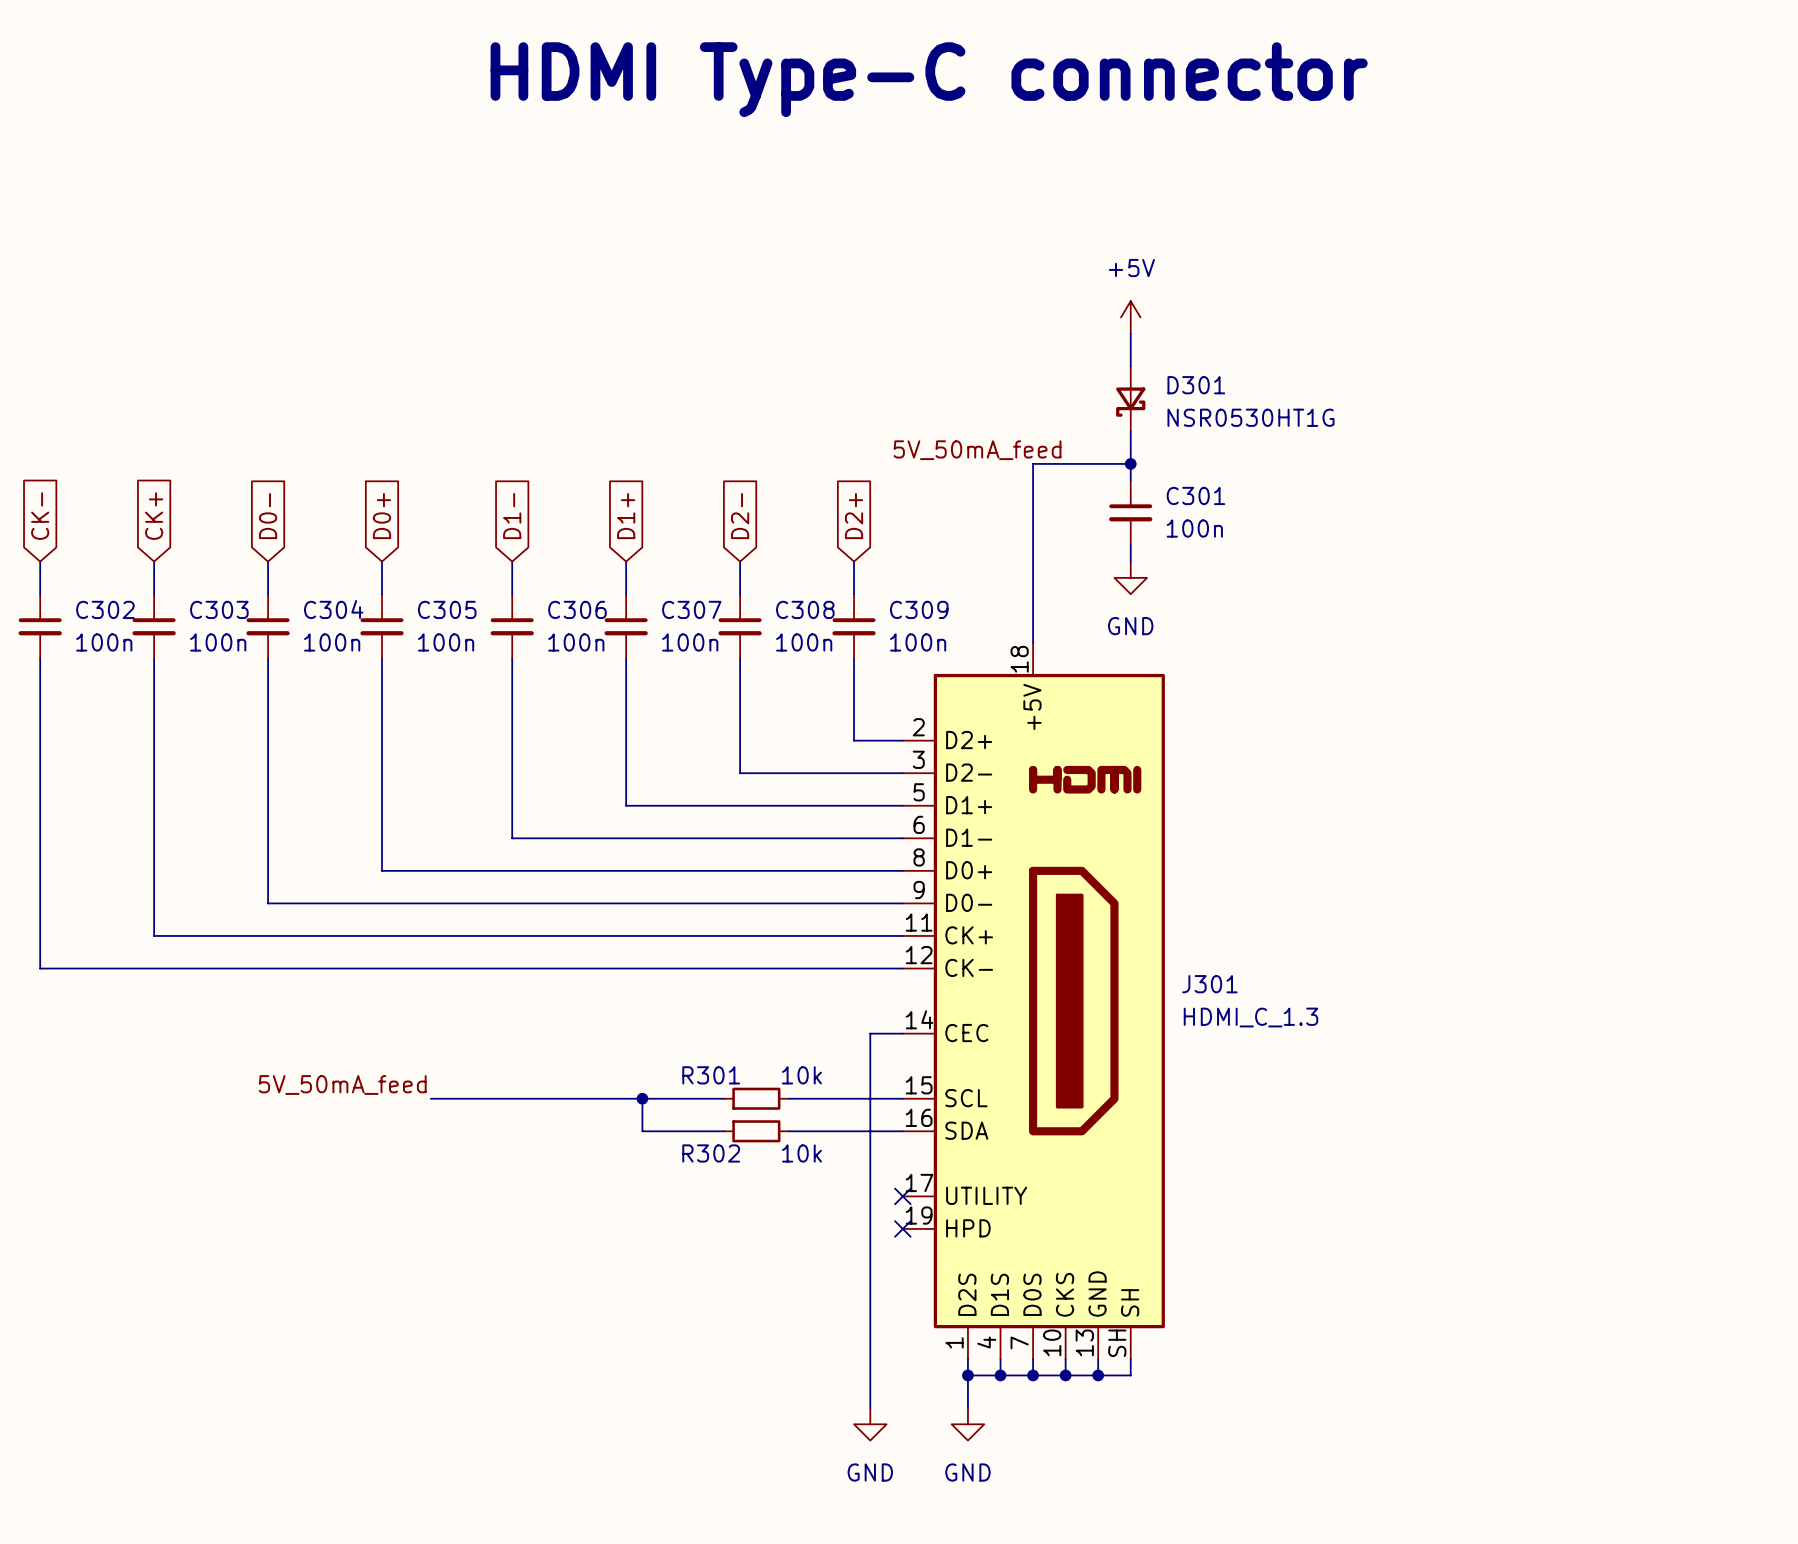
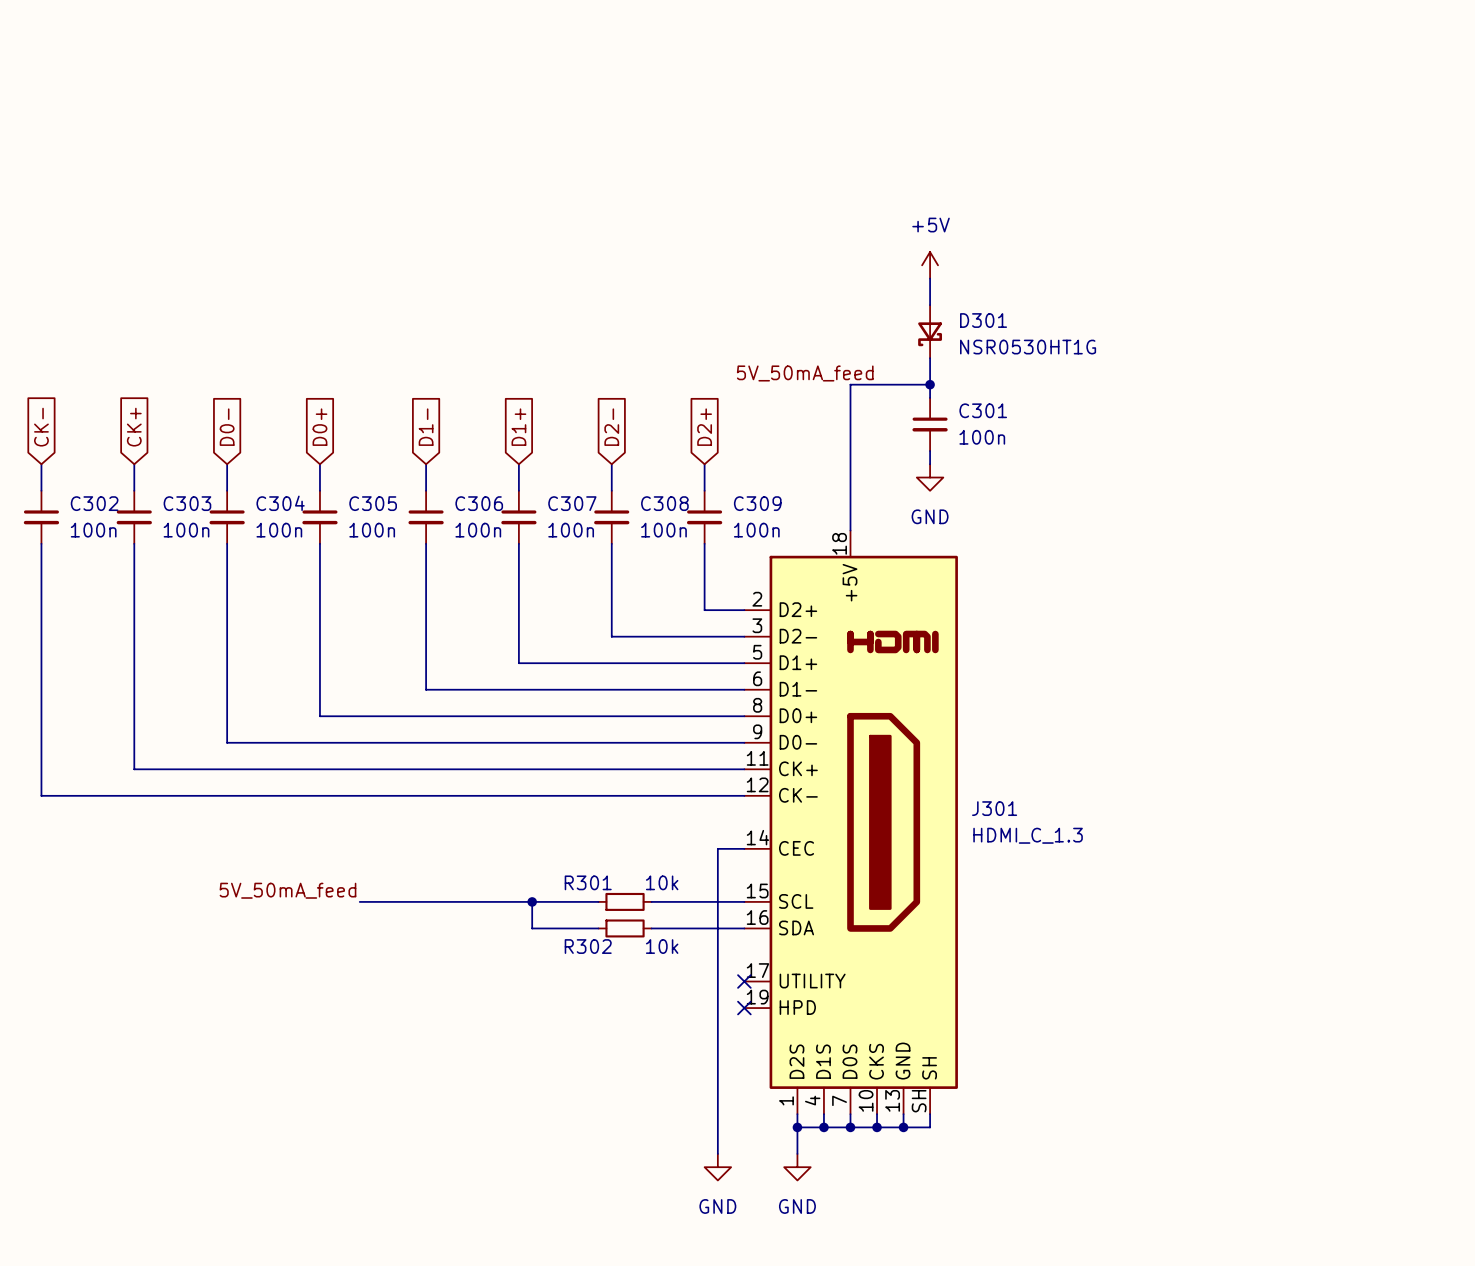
text: HDMI Type-C connector (929, 79) -> none

